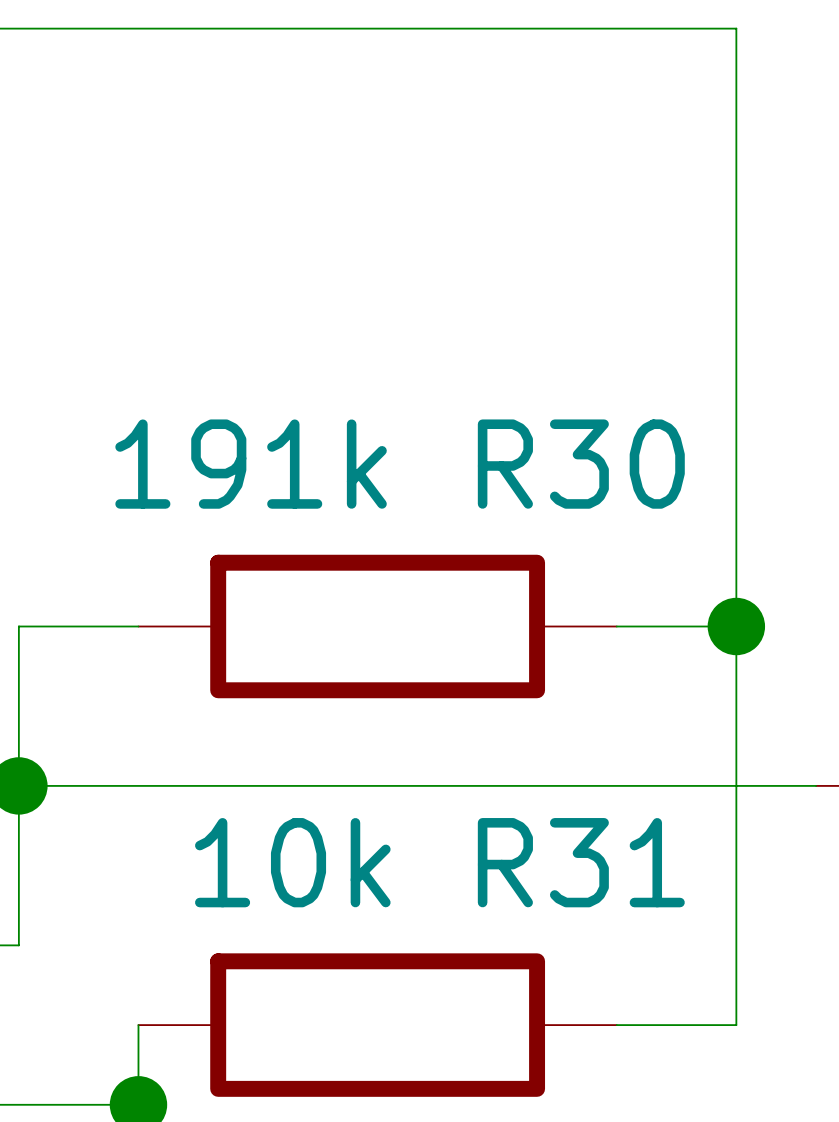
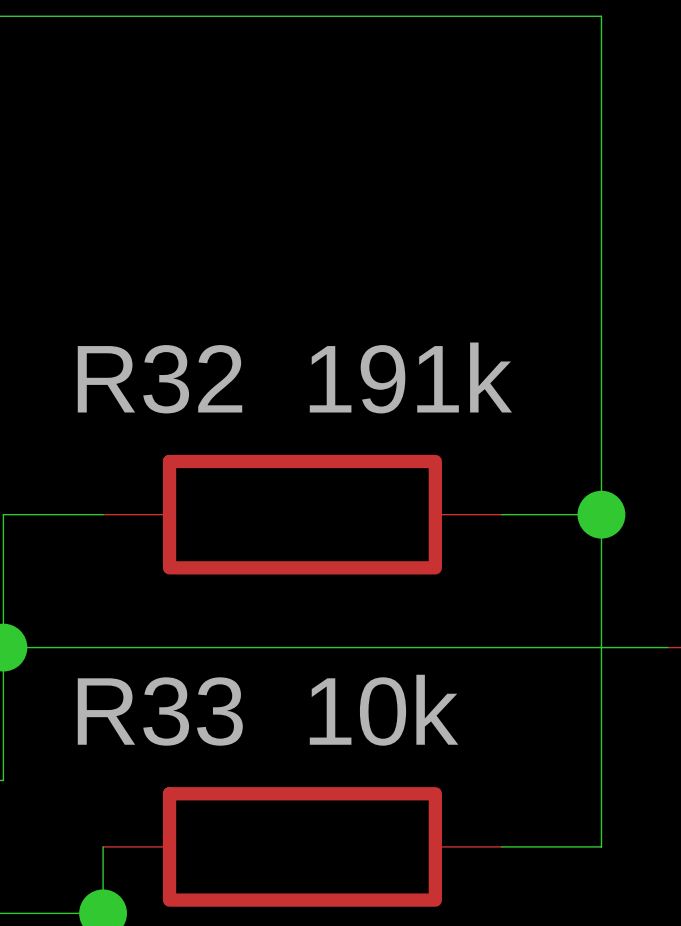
R30 value position: 191k (251, 464) -> 191k (410, 377)
R30 name: R30 (581, 464) -> R32 (159, 379)
R31 value position: 10k (292, 862) -> 10k (384, 710)
R31 name: R31 (581, 862) -> R33 (160, 711)

